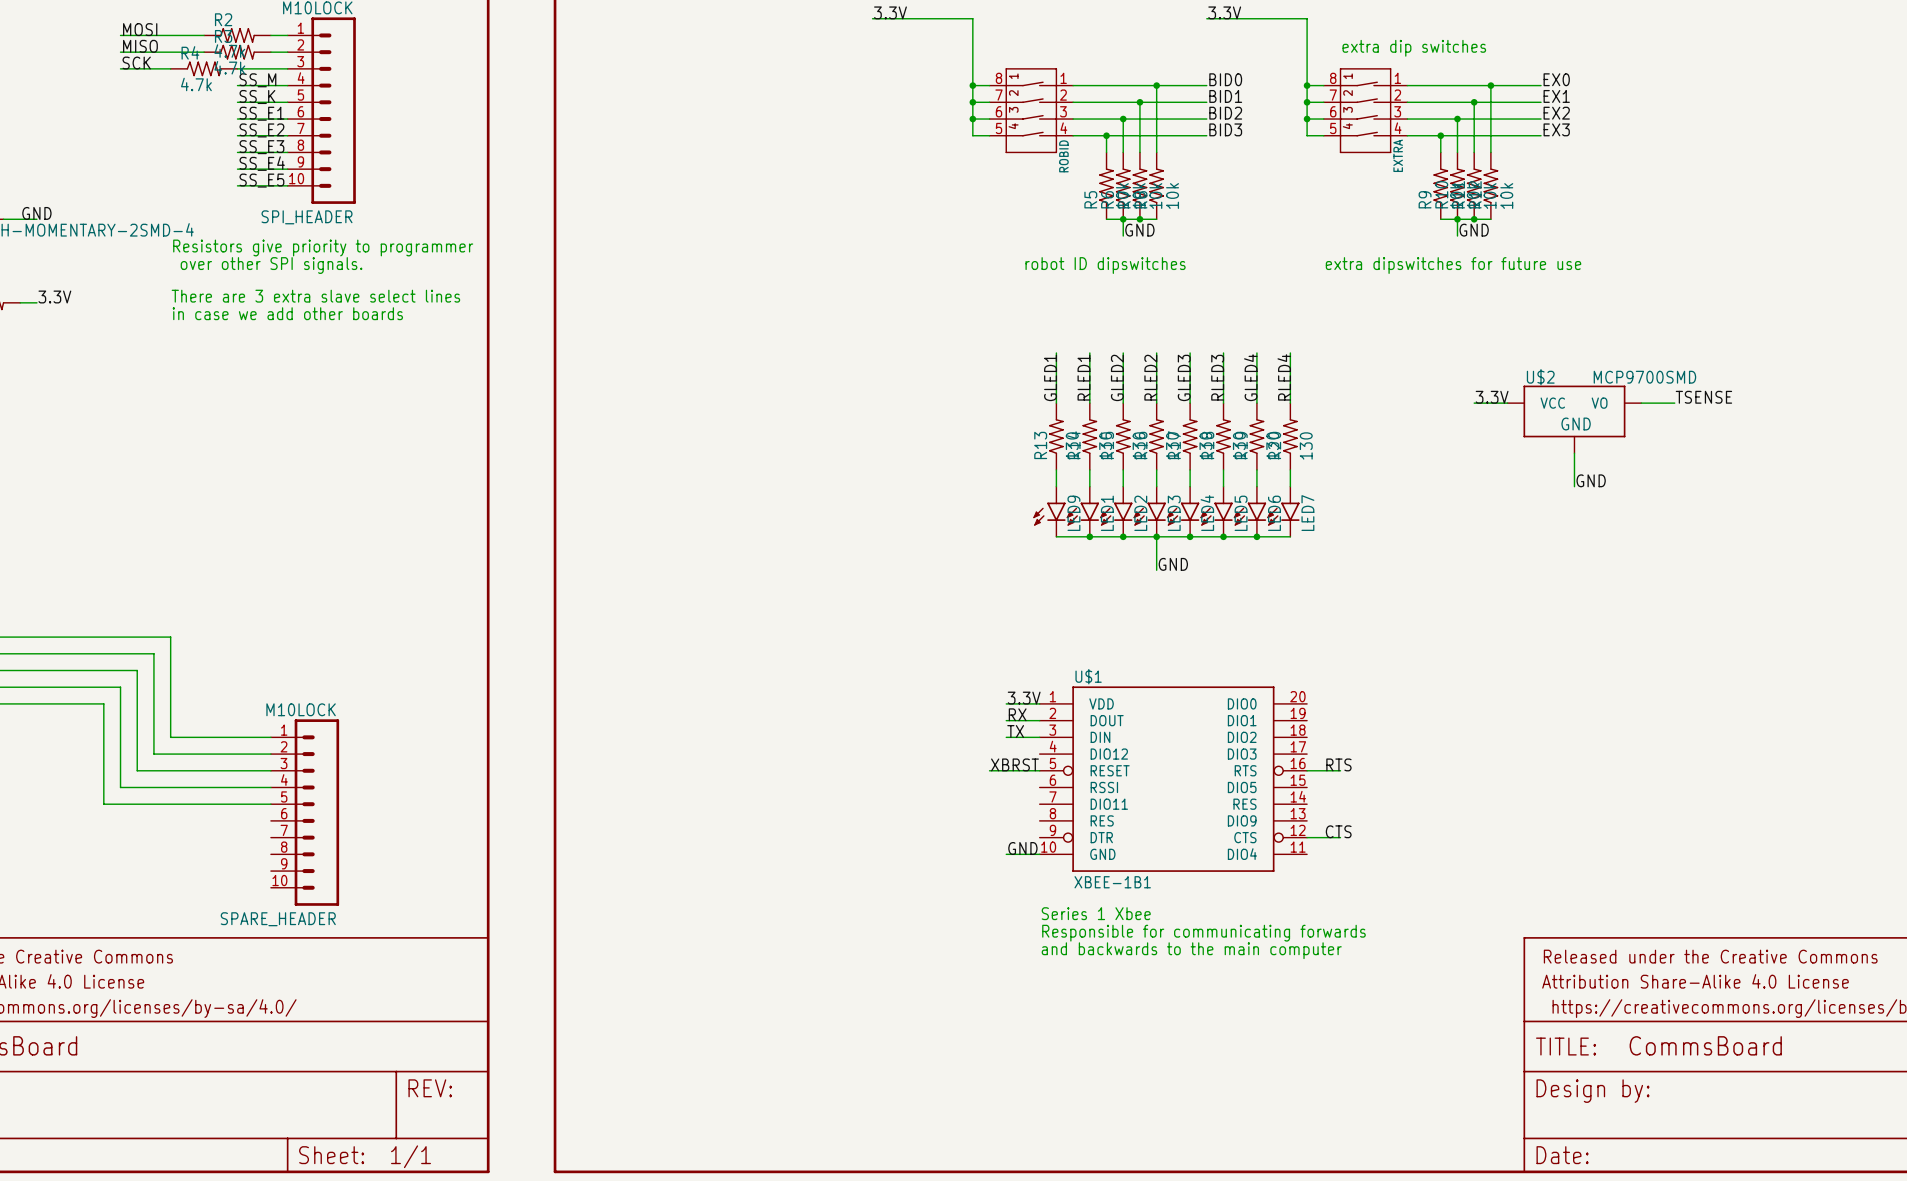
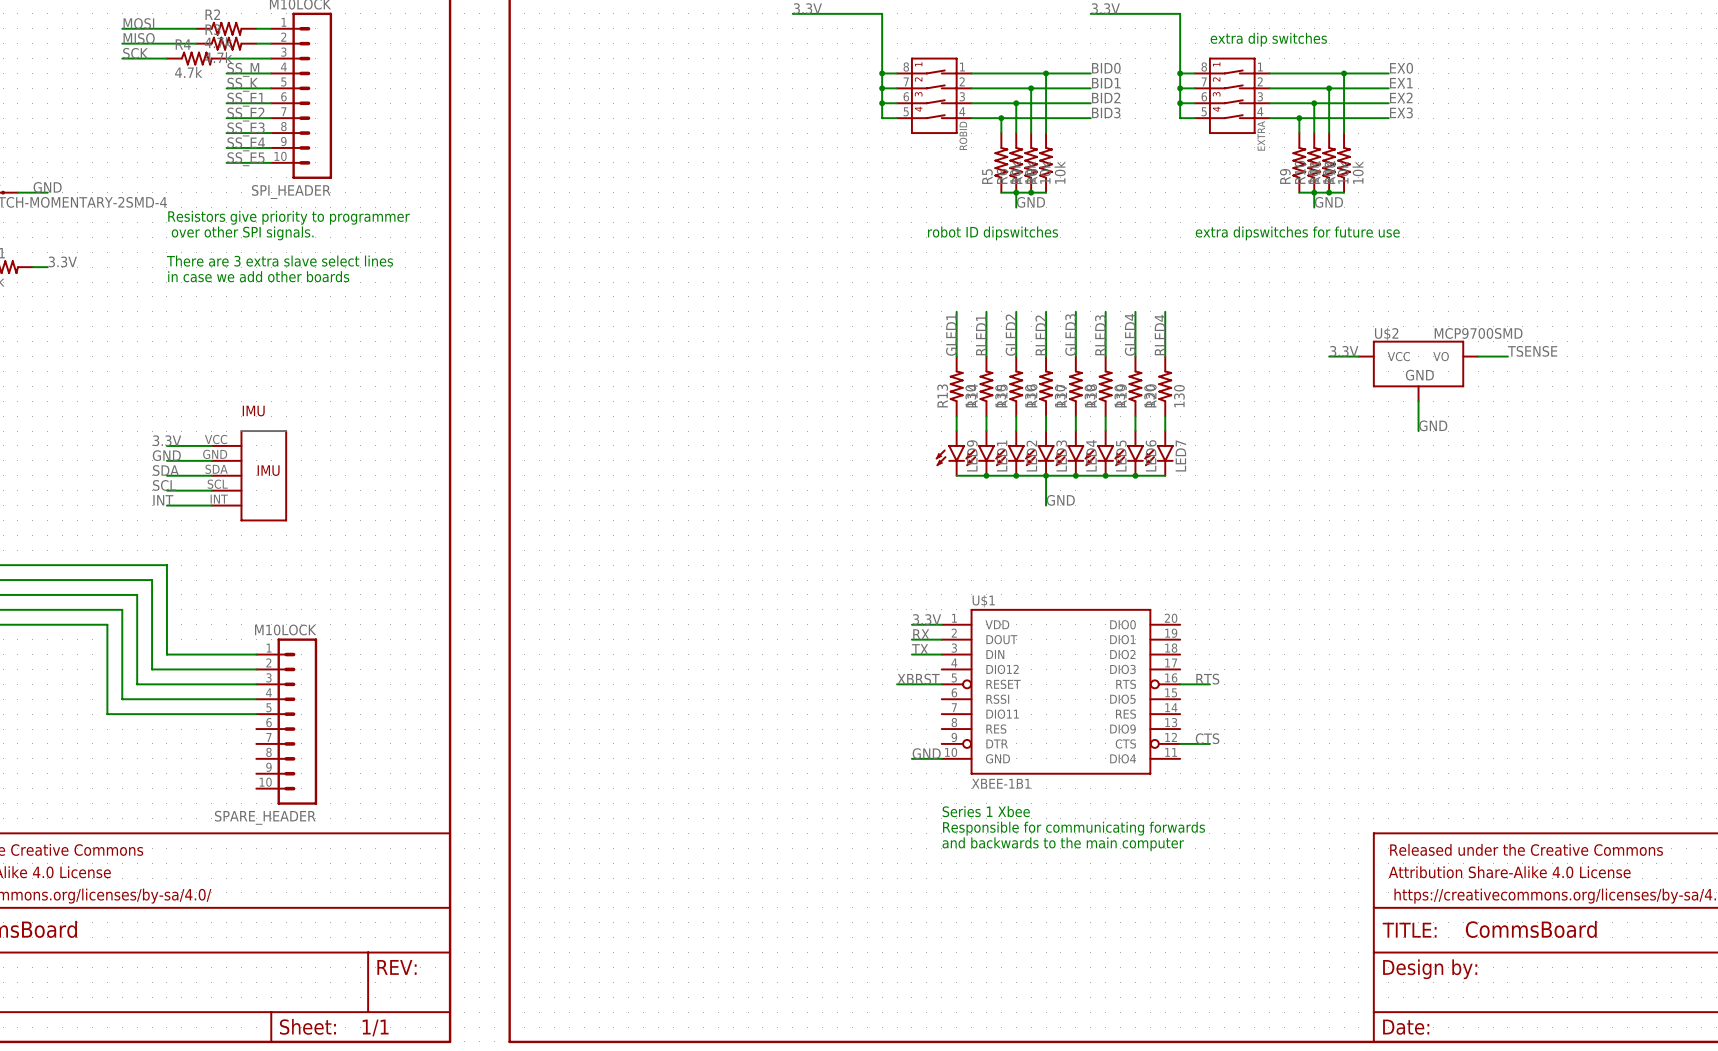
label: none -> 3.3V (167, 440)
wire: none -> (166, 445) (211, 445)
label: none -> GND (166, 455)
wire: none -> (166, 460) (211, 460)
label: none -> SDA (165, 470)
wire: none -> (166, 475) (211, 475)
IMU: none -> (249, 475)
label: none -> SCL (164, 485)
wire: none -> (166, 490) (211, 490)
label: none -> INT (163, 500)
wire: none -> (166, 505) (211, 505)

